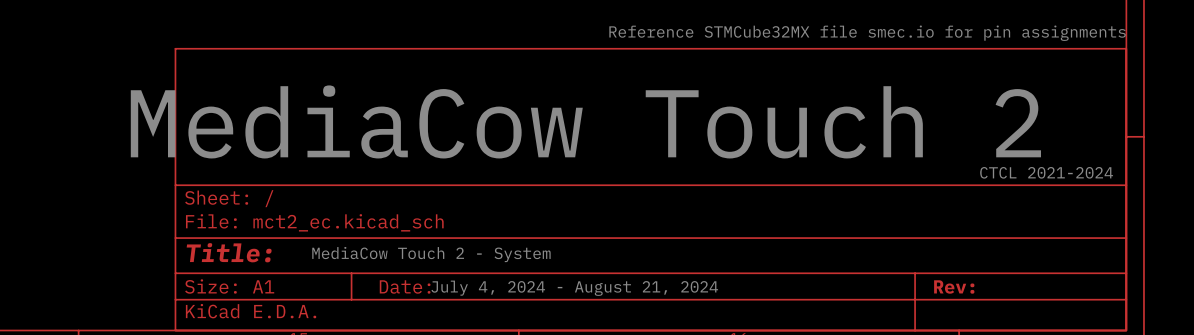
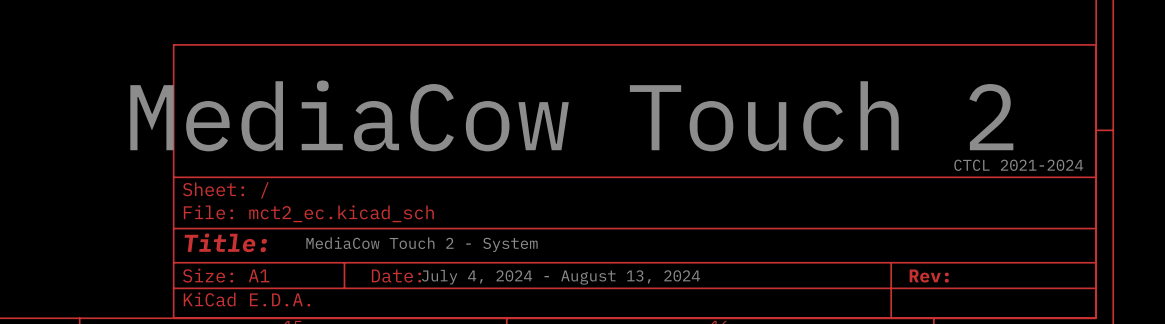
text: Reference STMCube32MX file smec.io for pin assignments (867, 33) -> none
text: July 4, 2024 - August 21, 2024 (574, 288) -> July 4, 2024 - August 13, 2024 (561, 277)

